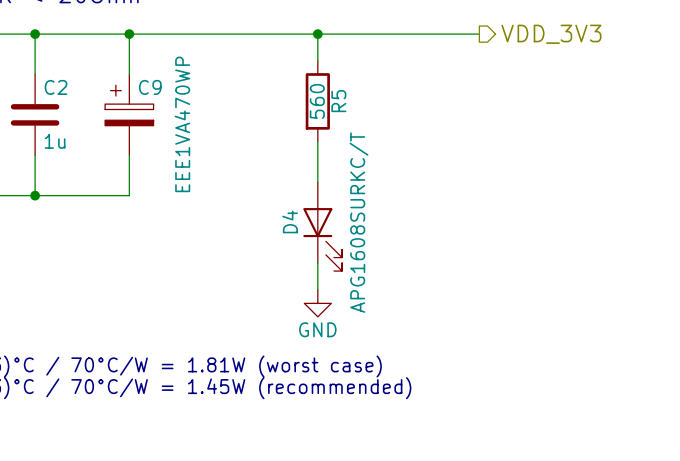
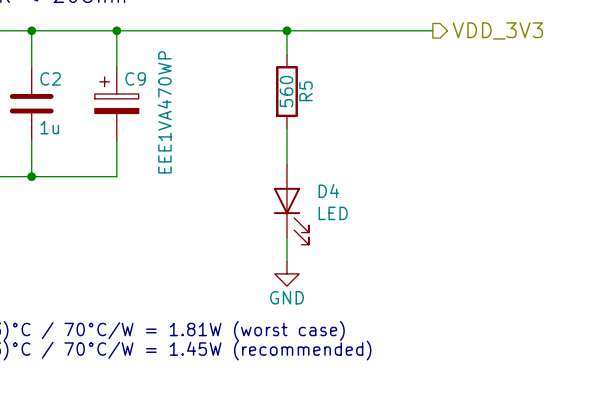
D4 name rotation: 0° (290, 221) -> 90° clockwise (328, 191)
D4 name position: D4 (290, 221) -> D4 (328, 191)
D4 value: APG1608SURKC/T (358, 222) -> LED (333, 213)

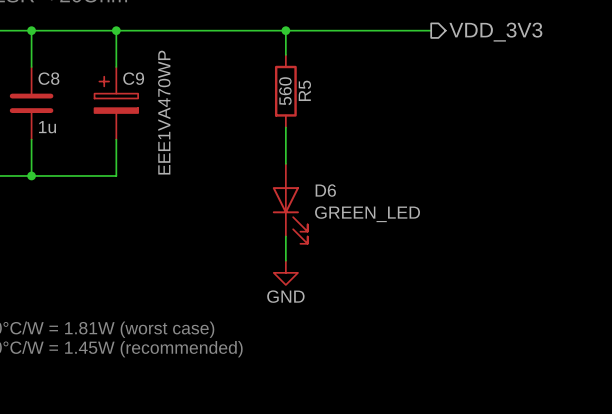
C2 name: C2 (50, 78) -> C8 (48, 78)
D4 name: D4 (328, 191) -> D6 (325, 190)
D4 value: LED (333, 213) -> GREEN_LED (367, 214)

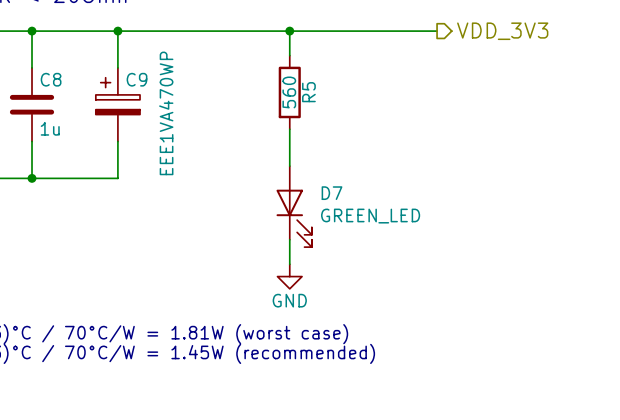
D6 name: D6 (325, 190) -> D7 (332, 193)

